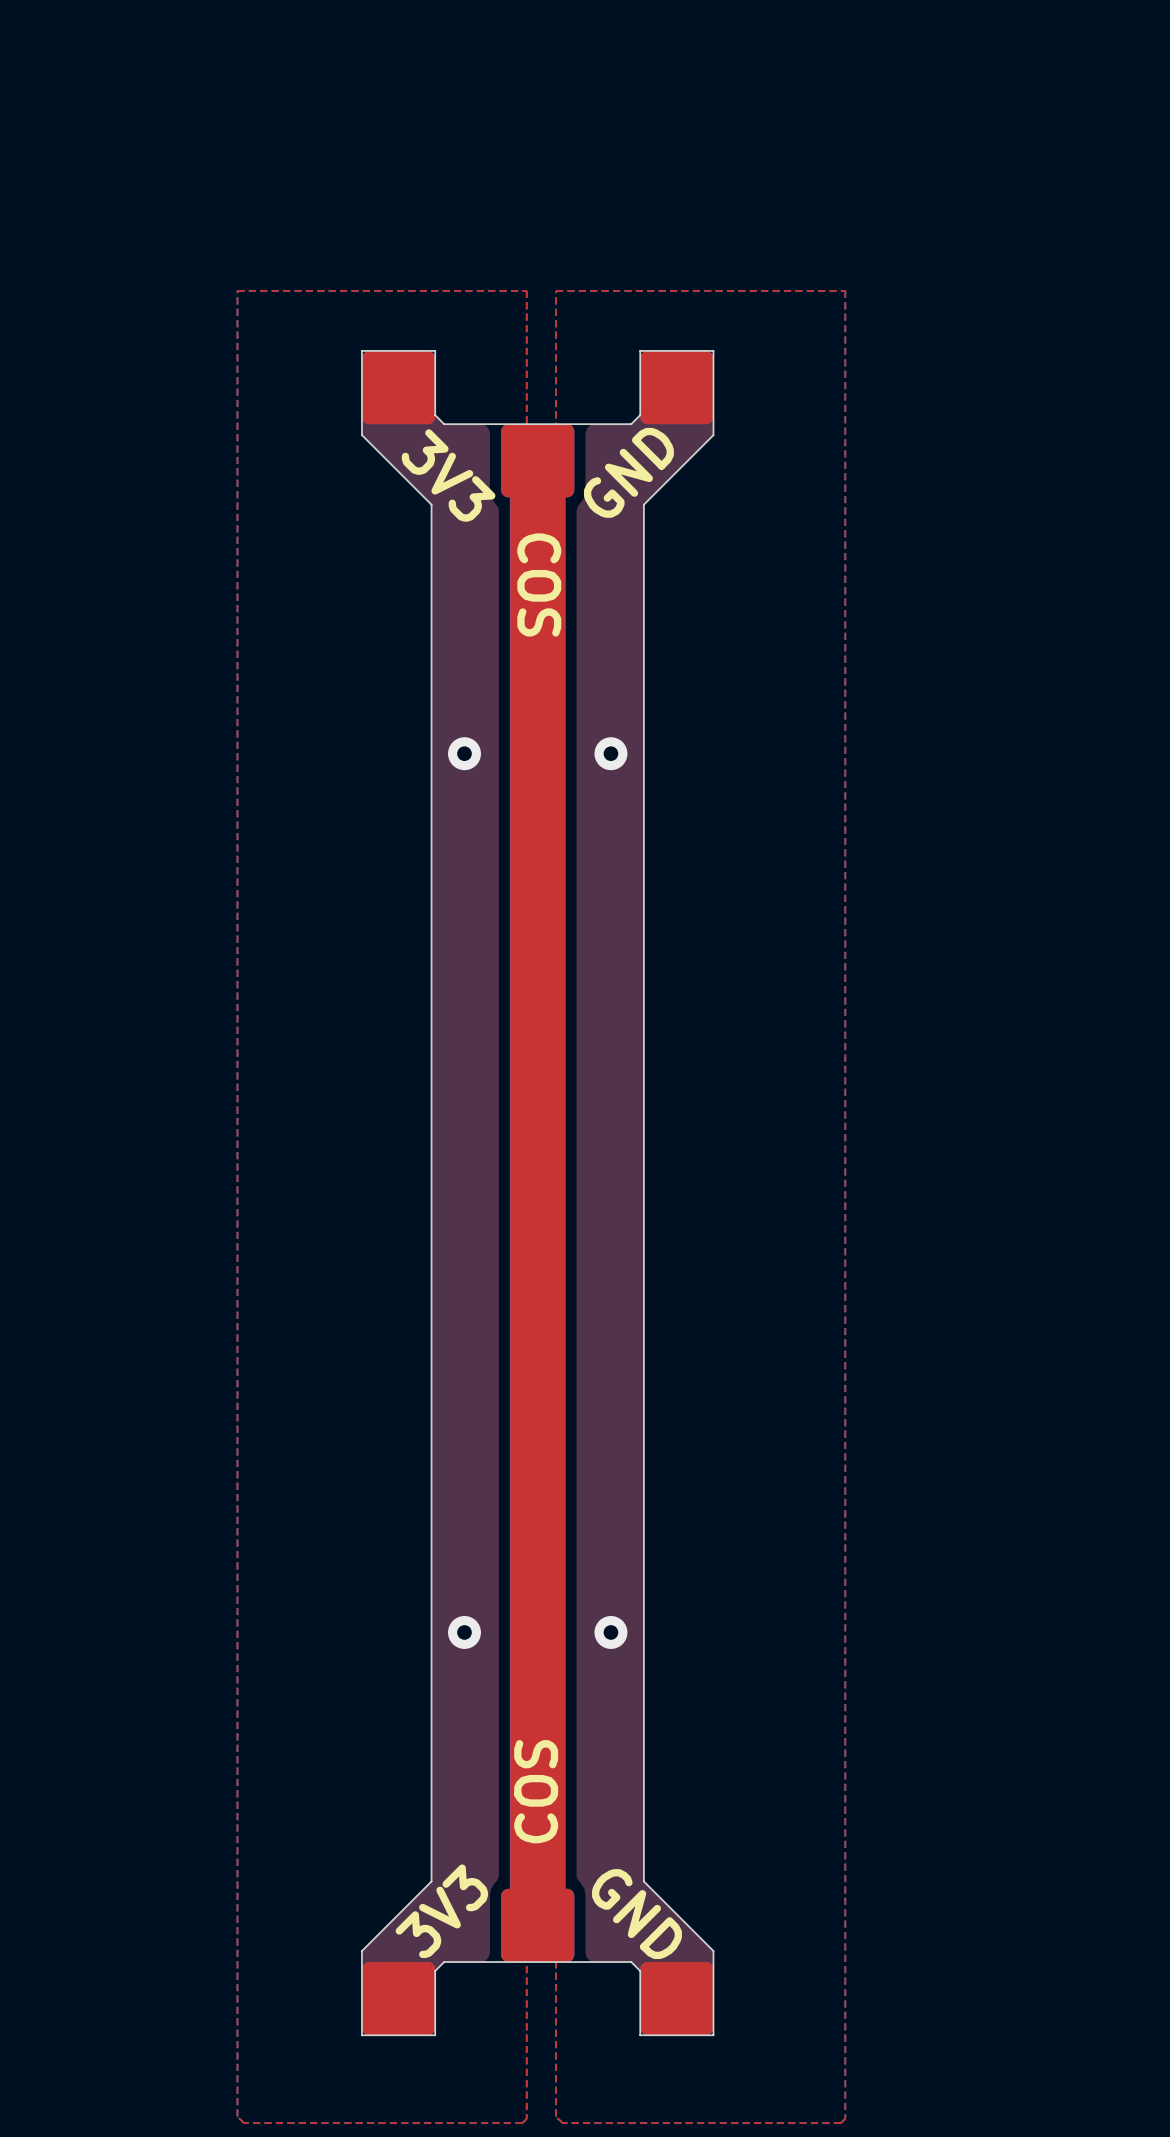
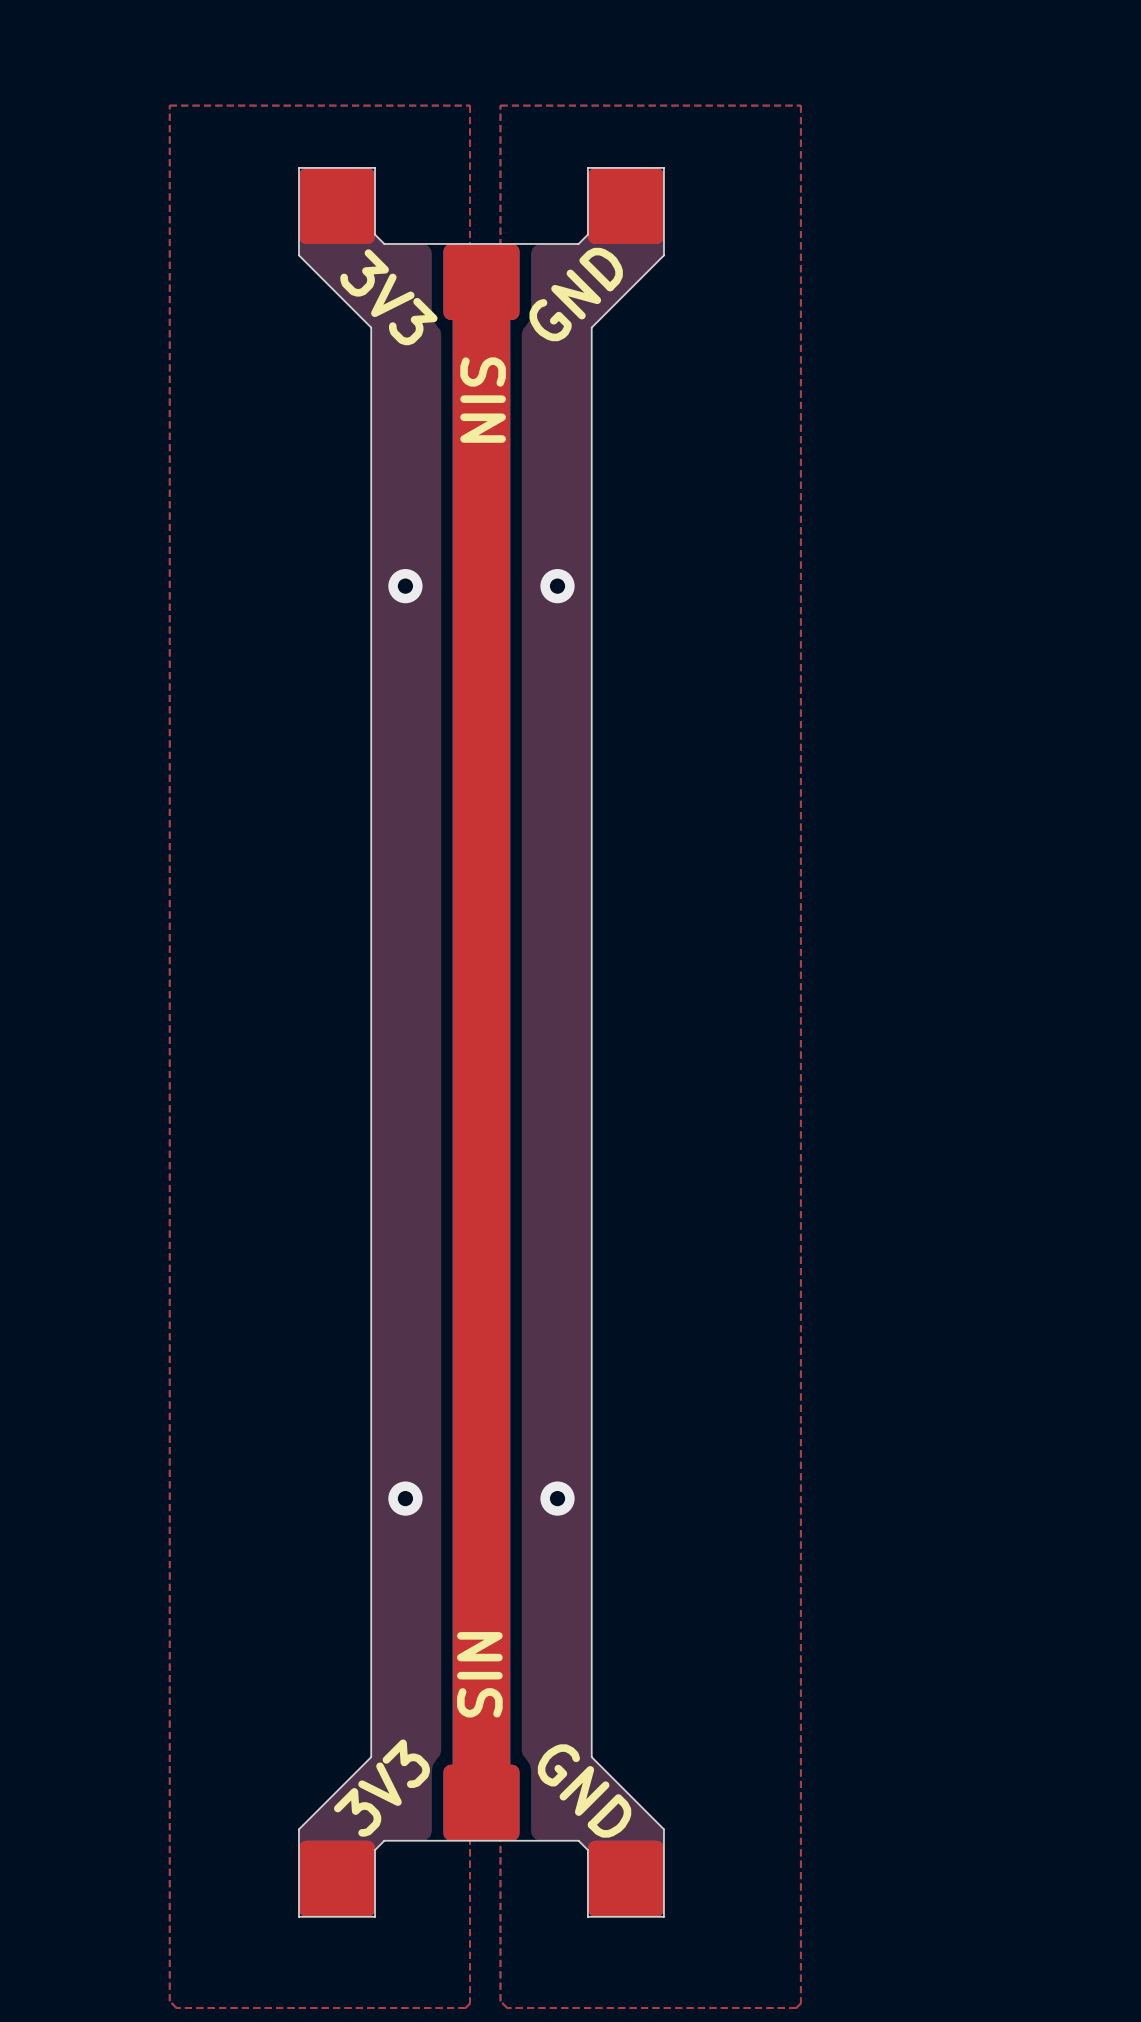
text: COS (539, 584) -> SIN (483, 400)
text: COS (536, 1791) -> SIN (479, 1674)

